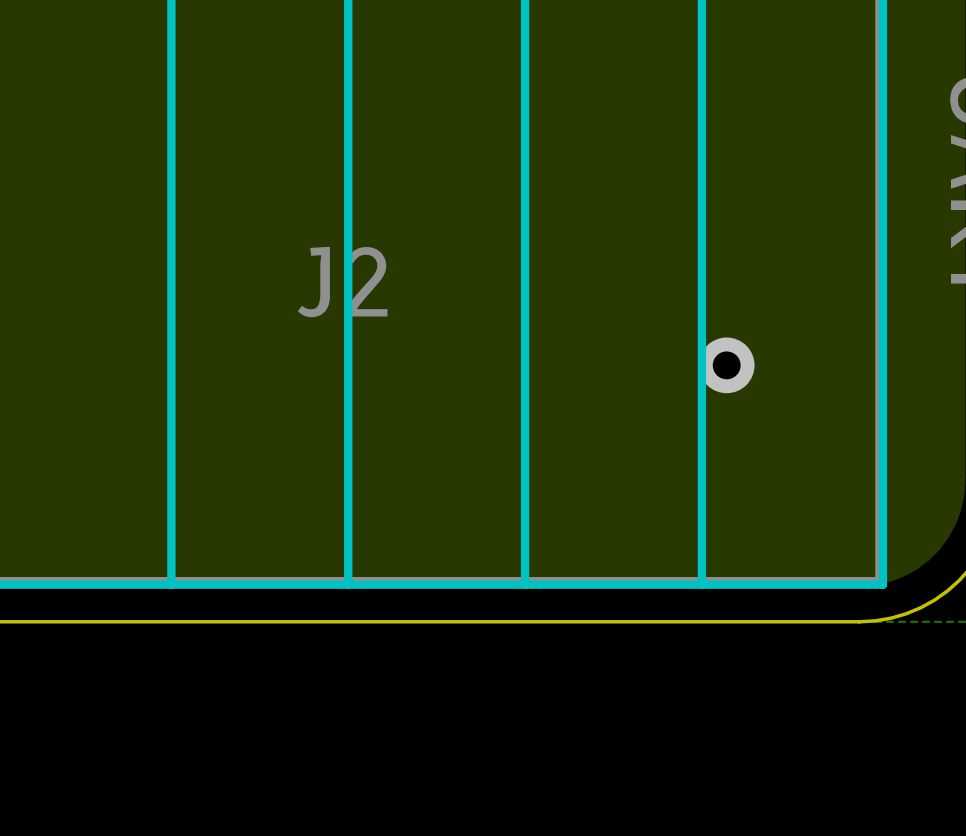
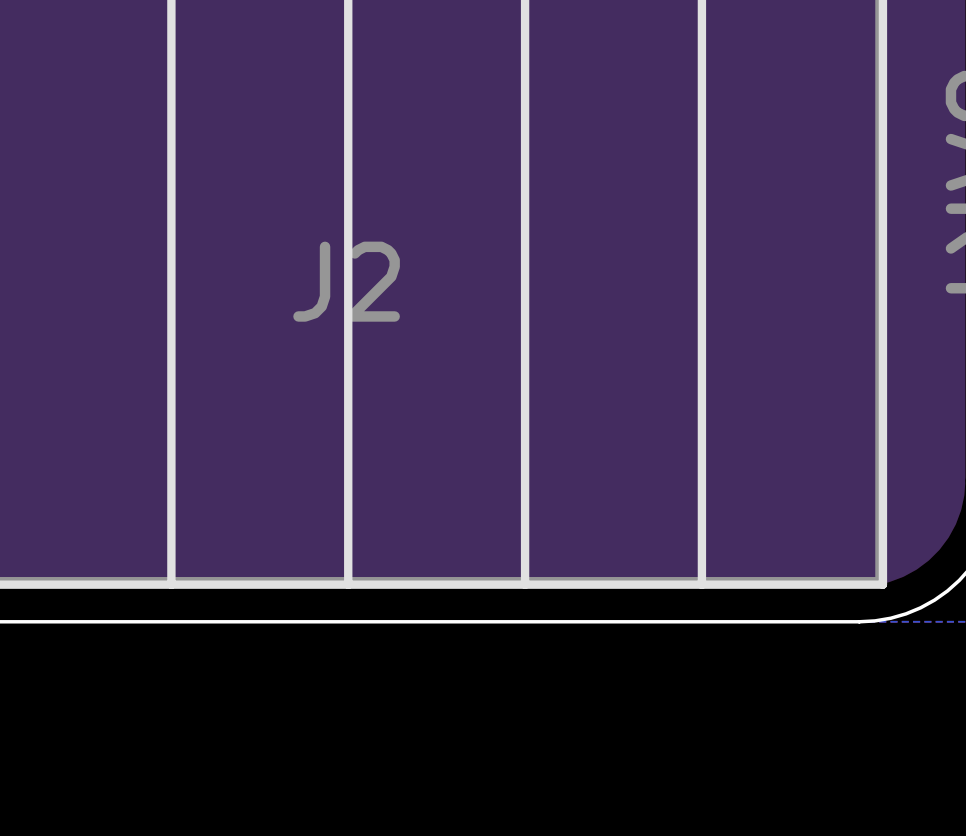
via: (726, 365) -> none

